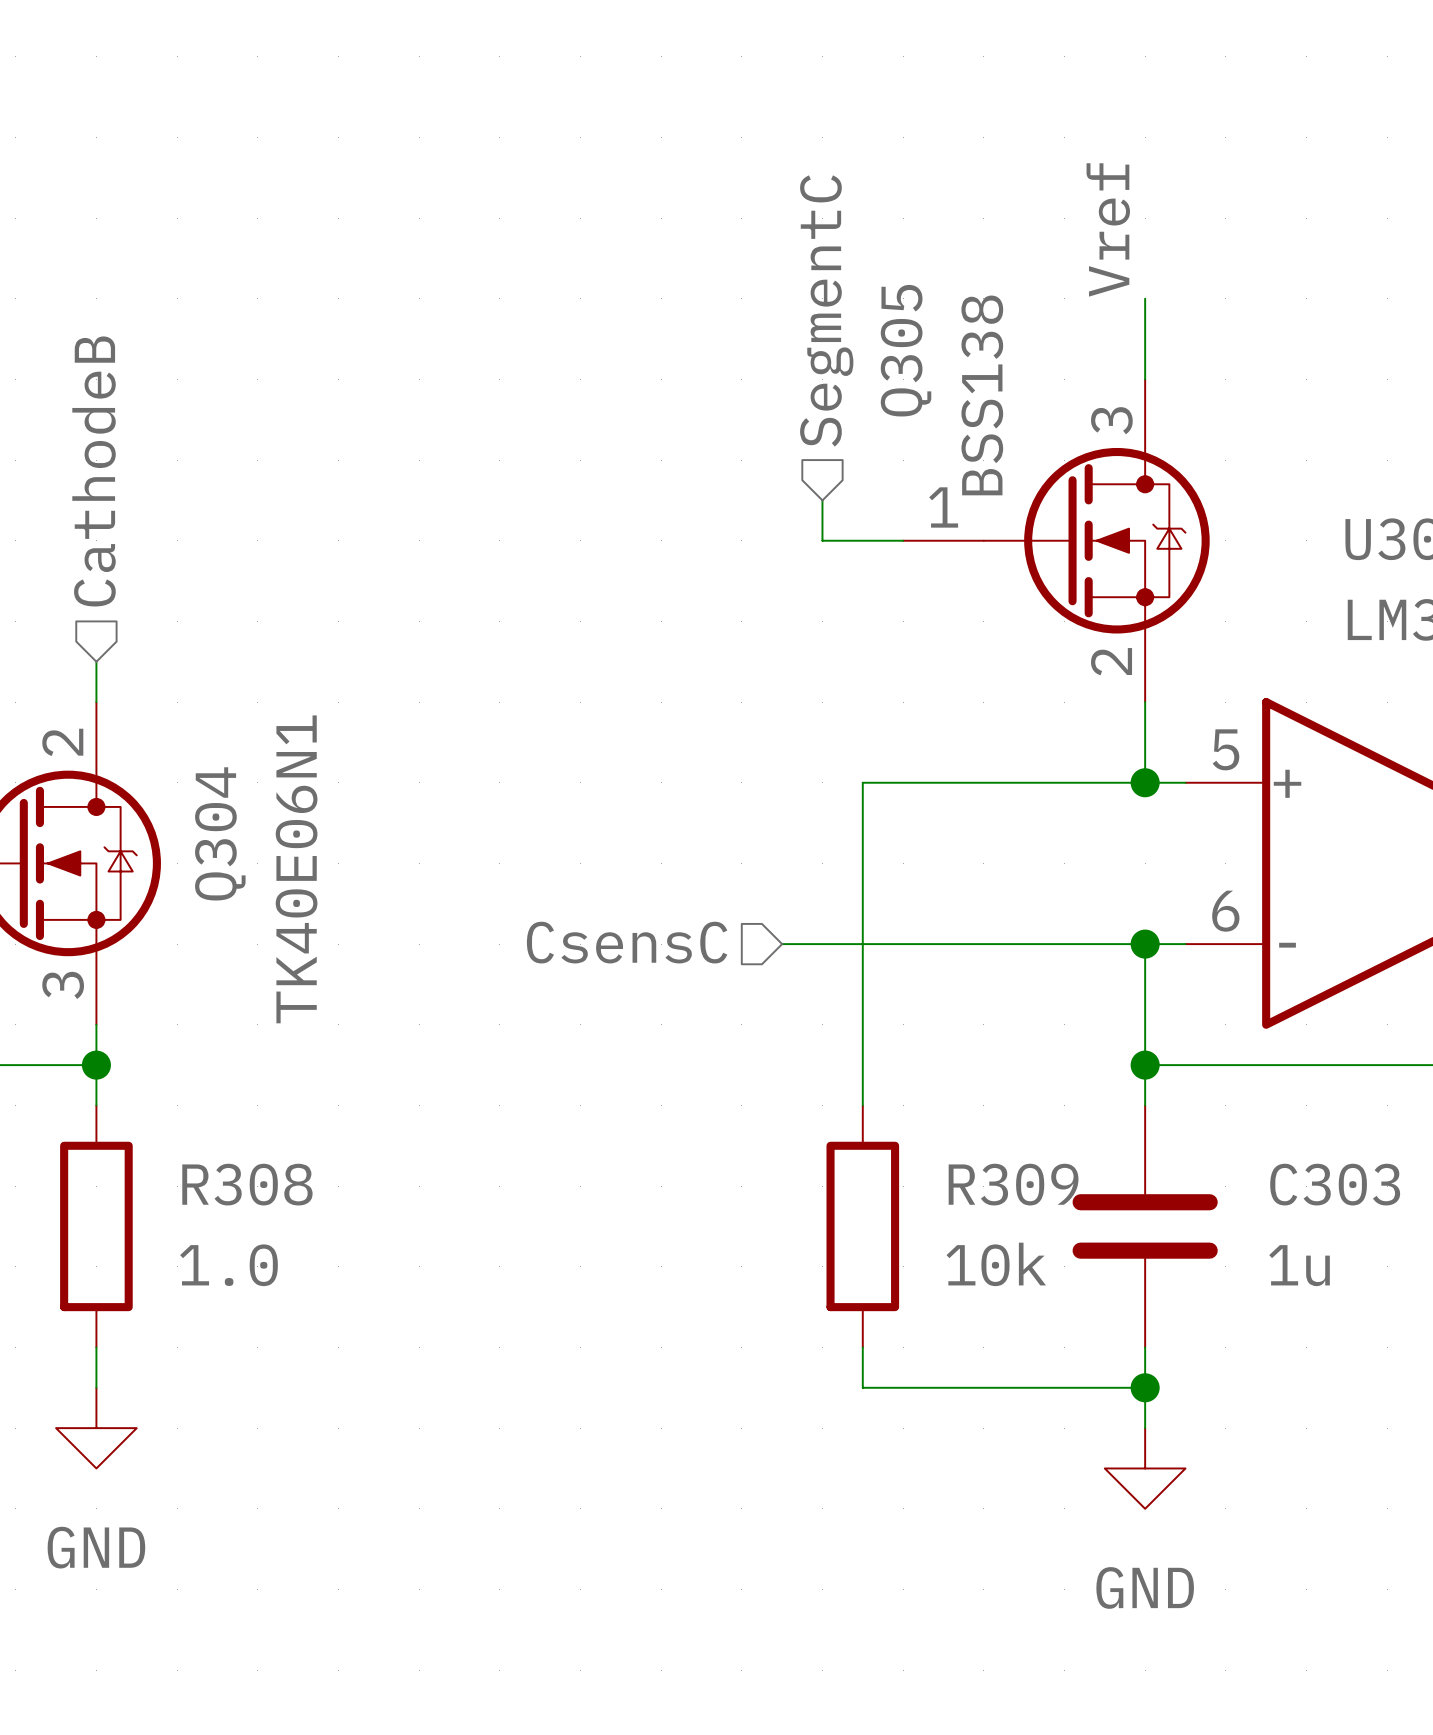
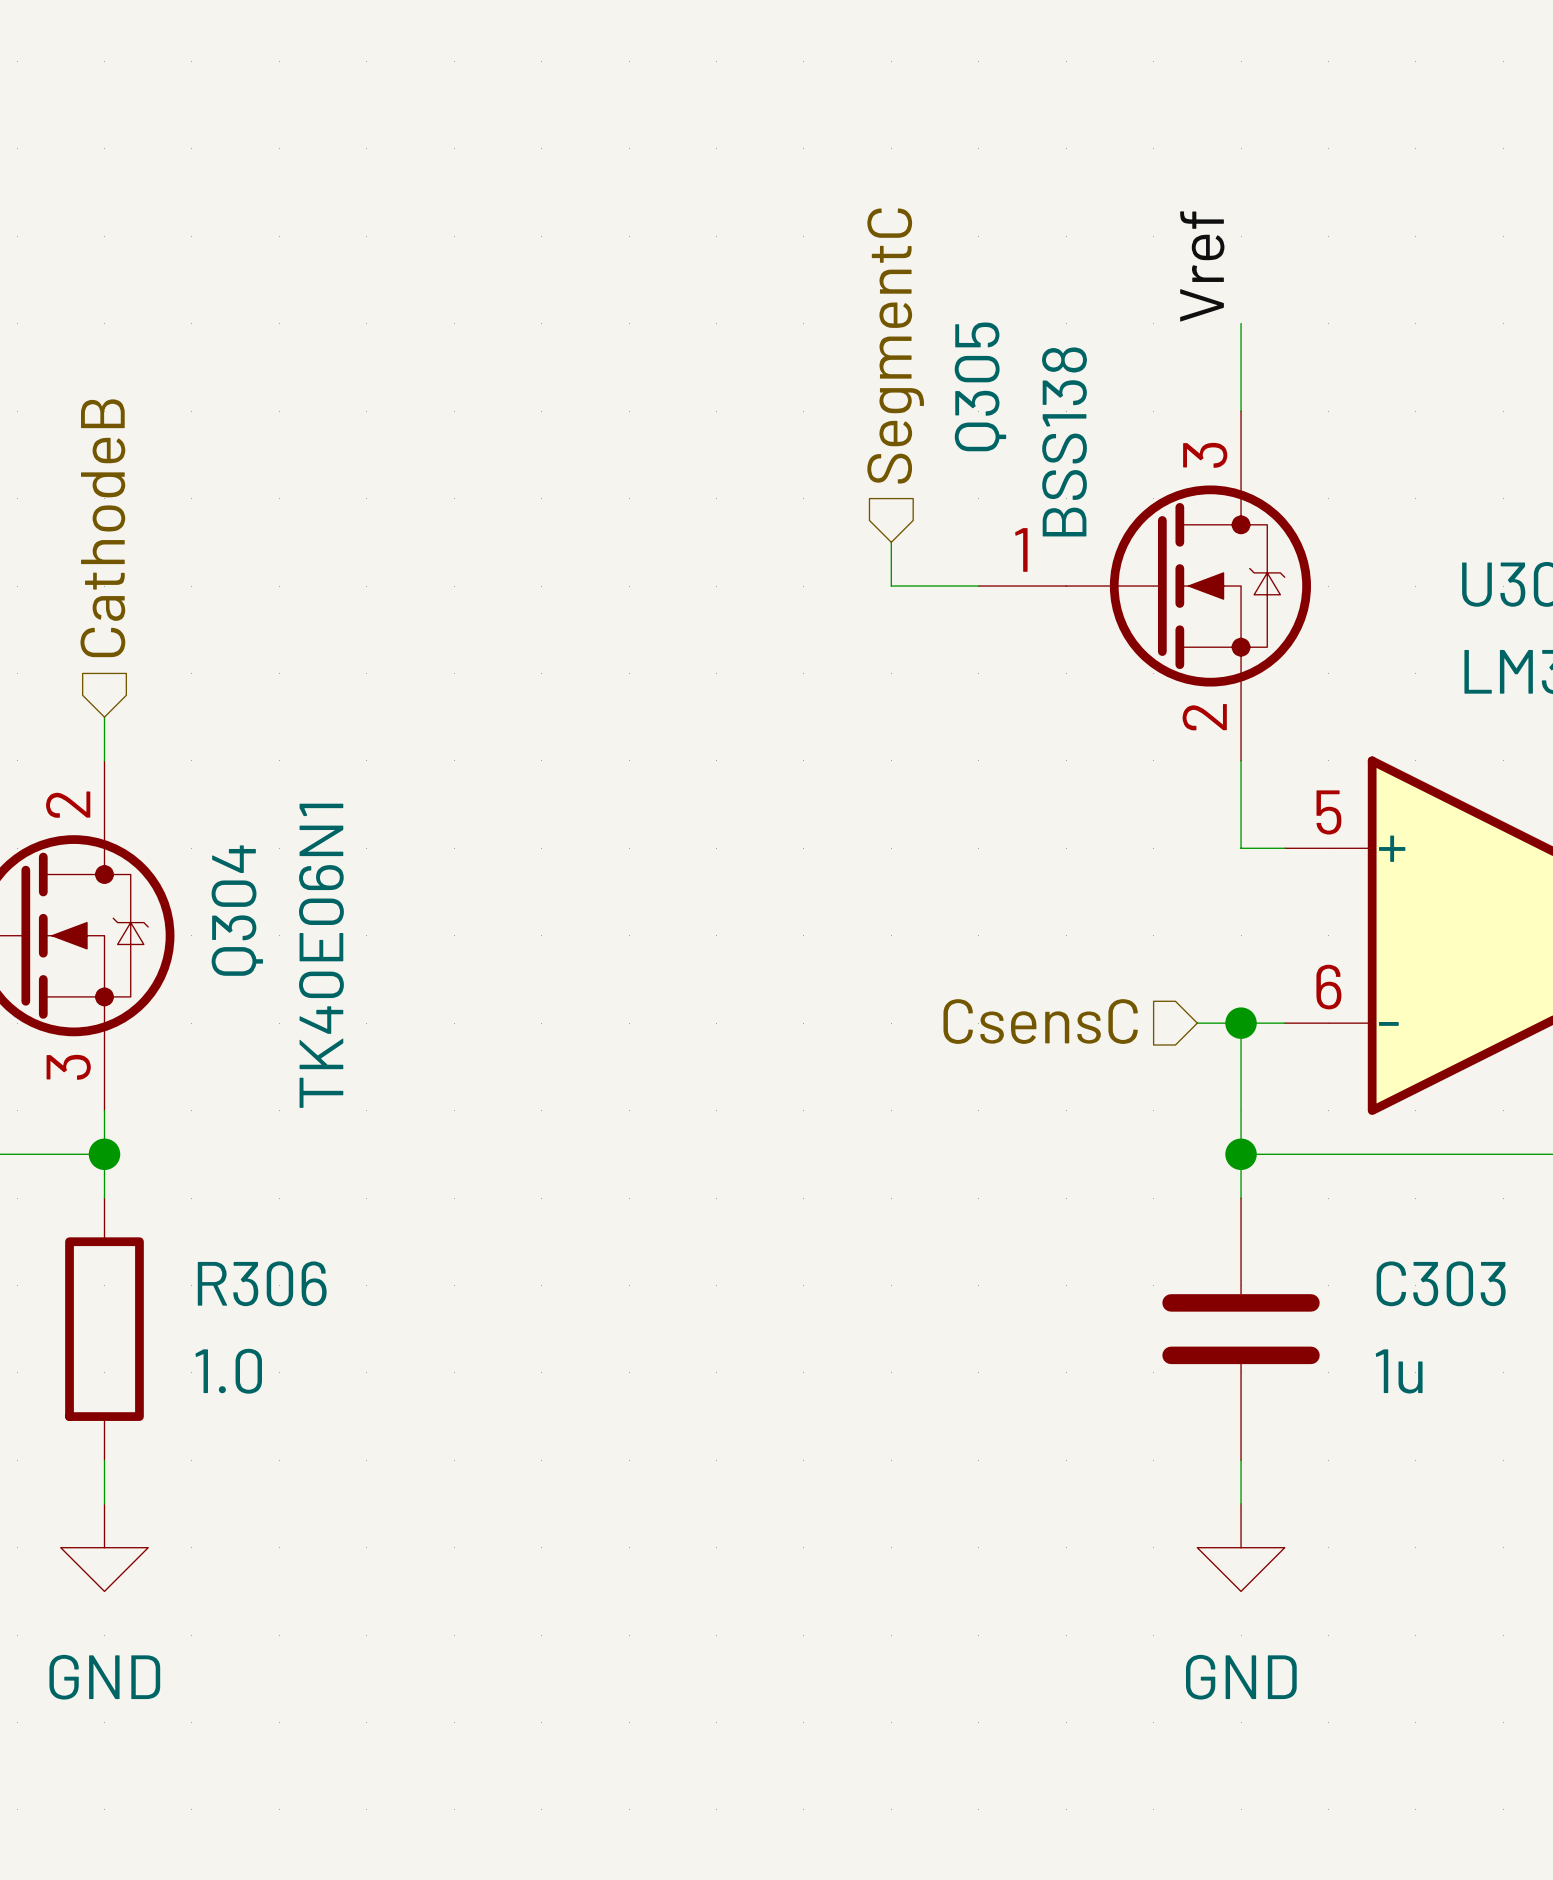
wire: (1145, 782) (862, 782) (862, 1105) -> none
junction: (1145, 782) -> none
hierarchical label position: CsensC (627, 942) -> CsensC (1040, 1021)
wire: (782, 944) (1104, 944) -> none
R308 name: R308 (247, 1184) -> R306 (262, 1283)
R309: 10k (862, 1226) -> none
wire: (862, 1347) (862, 1387) (1145, 1387) (1145, 1428) -> none
junction: (1145, 1387) -> none
power symbol position: GND (1145, 1468) -> GND (1241, 1547)

